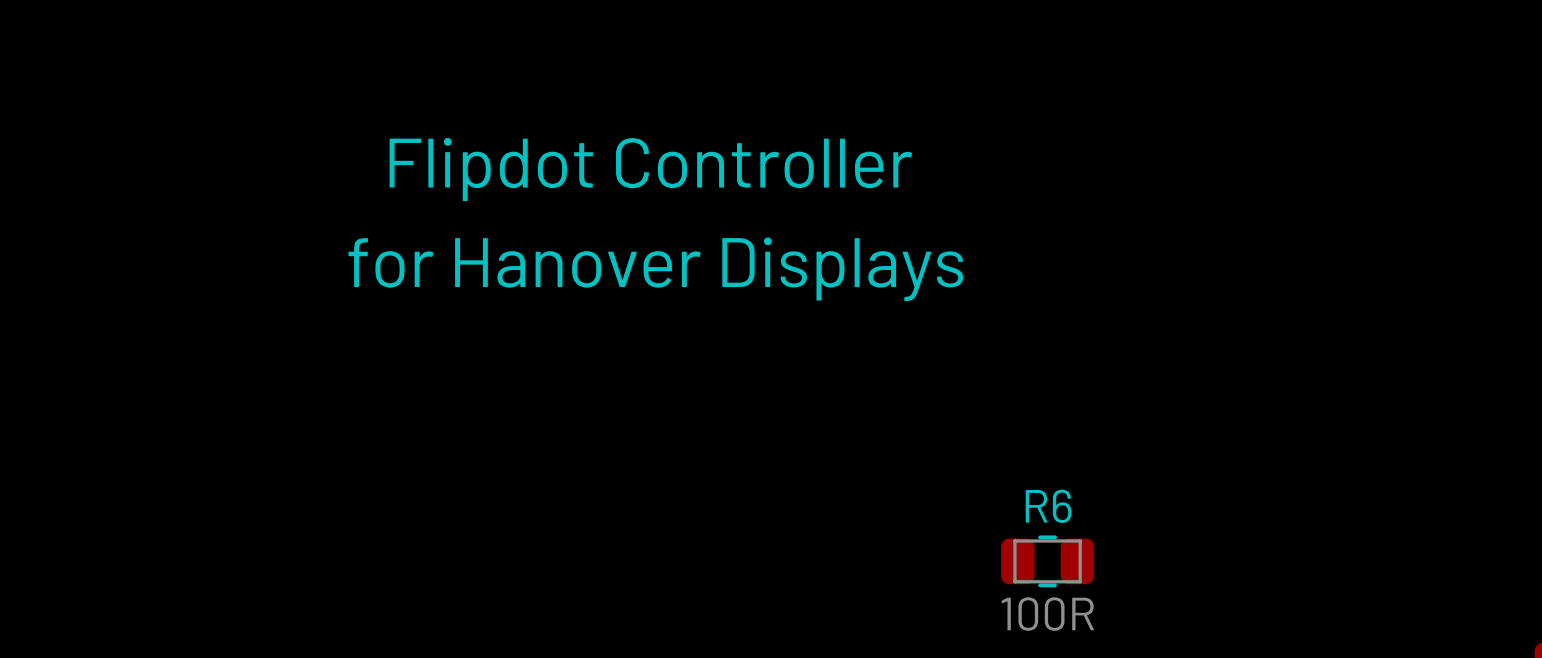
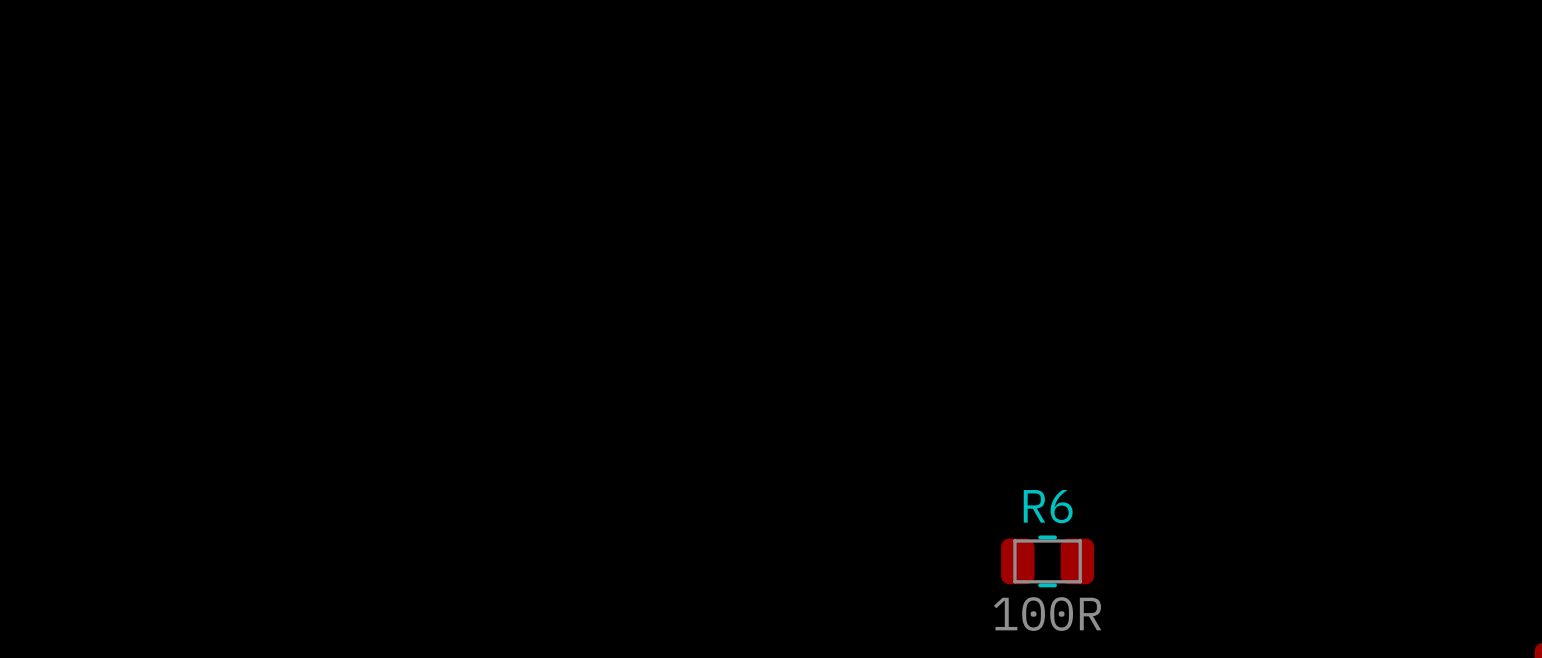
text: Flipdot Controller (650, 169) -> none
text: for Hanover Displays (655, 269) -> none

